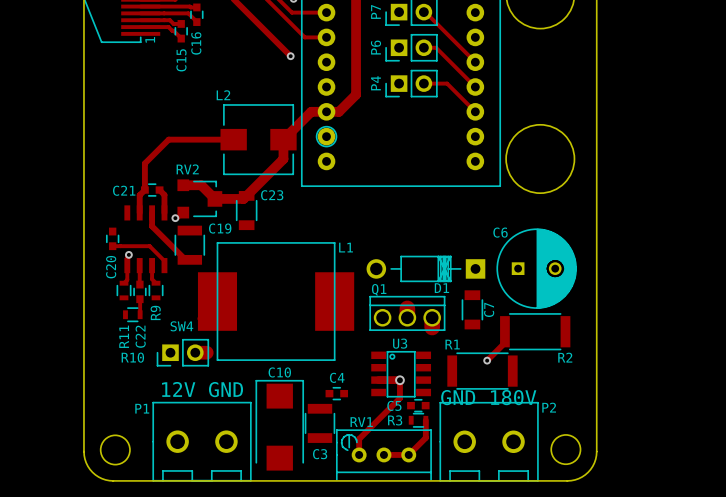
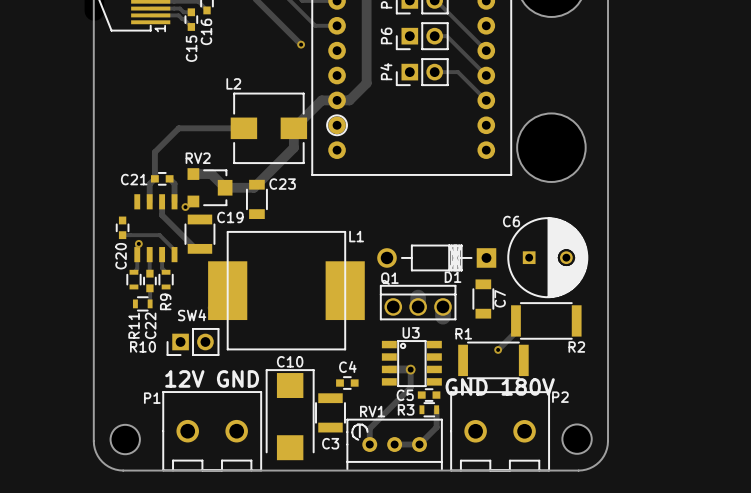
track: (195, 352) (206, 352) -> none

